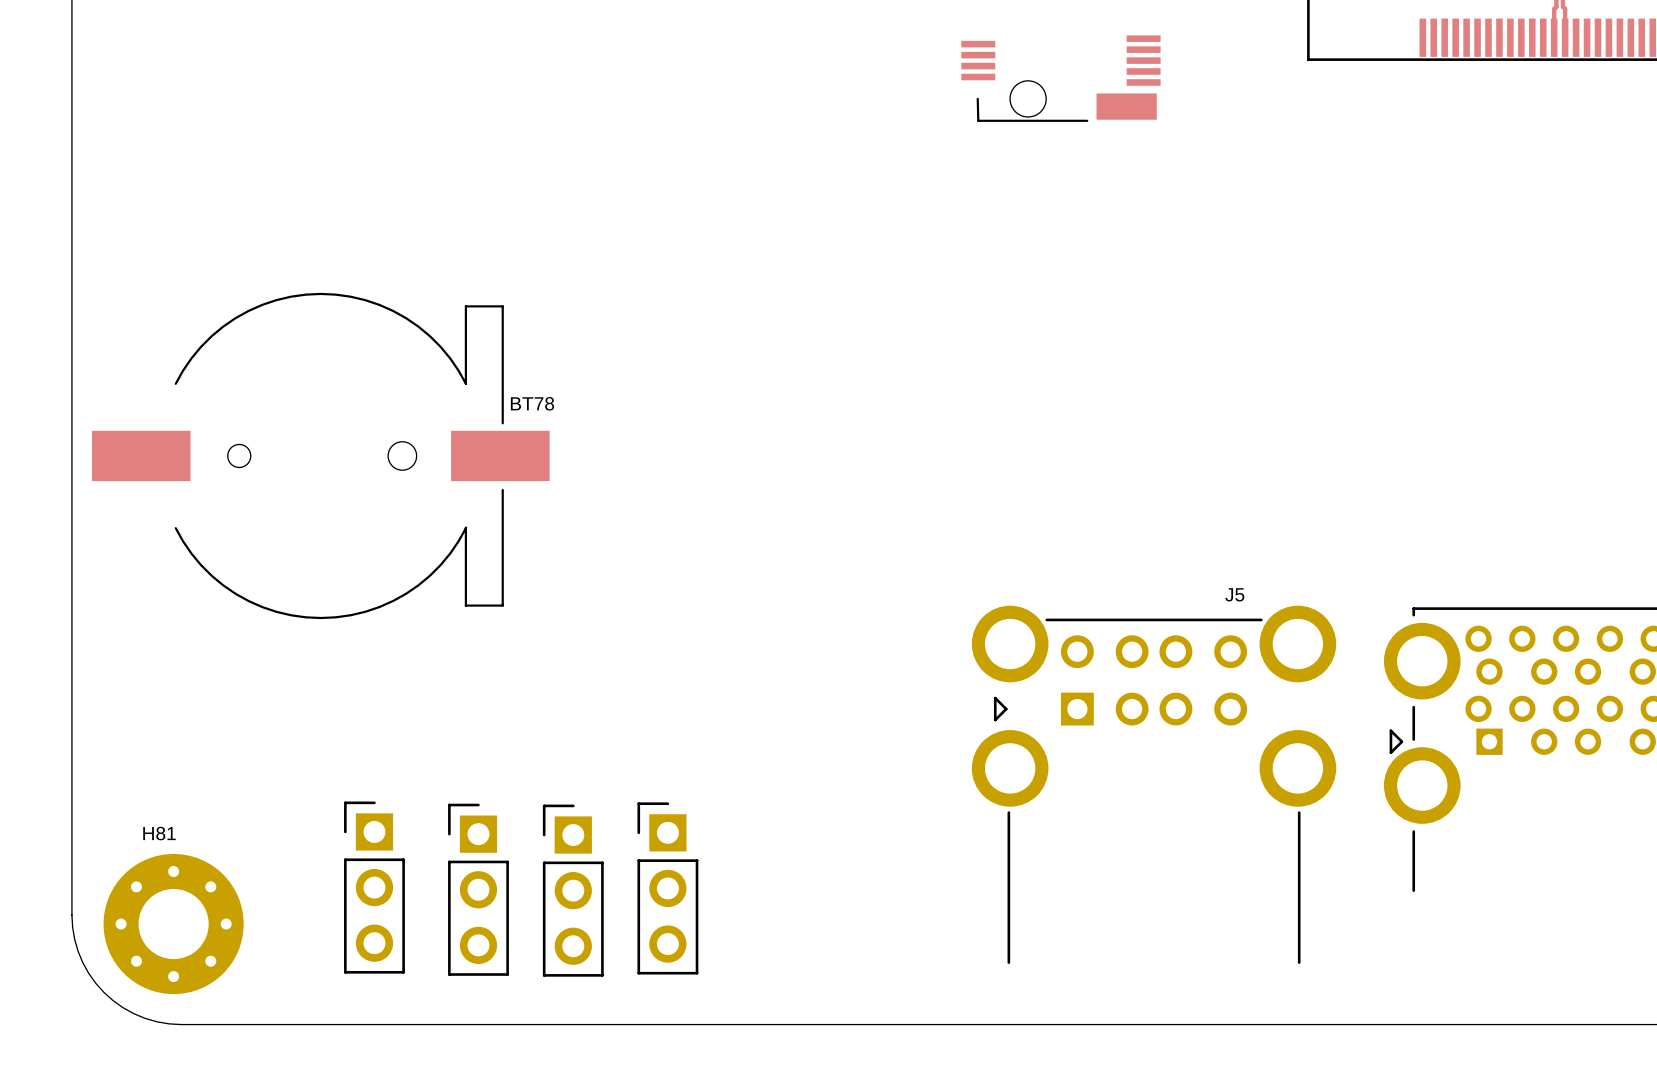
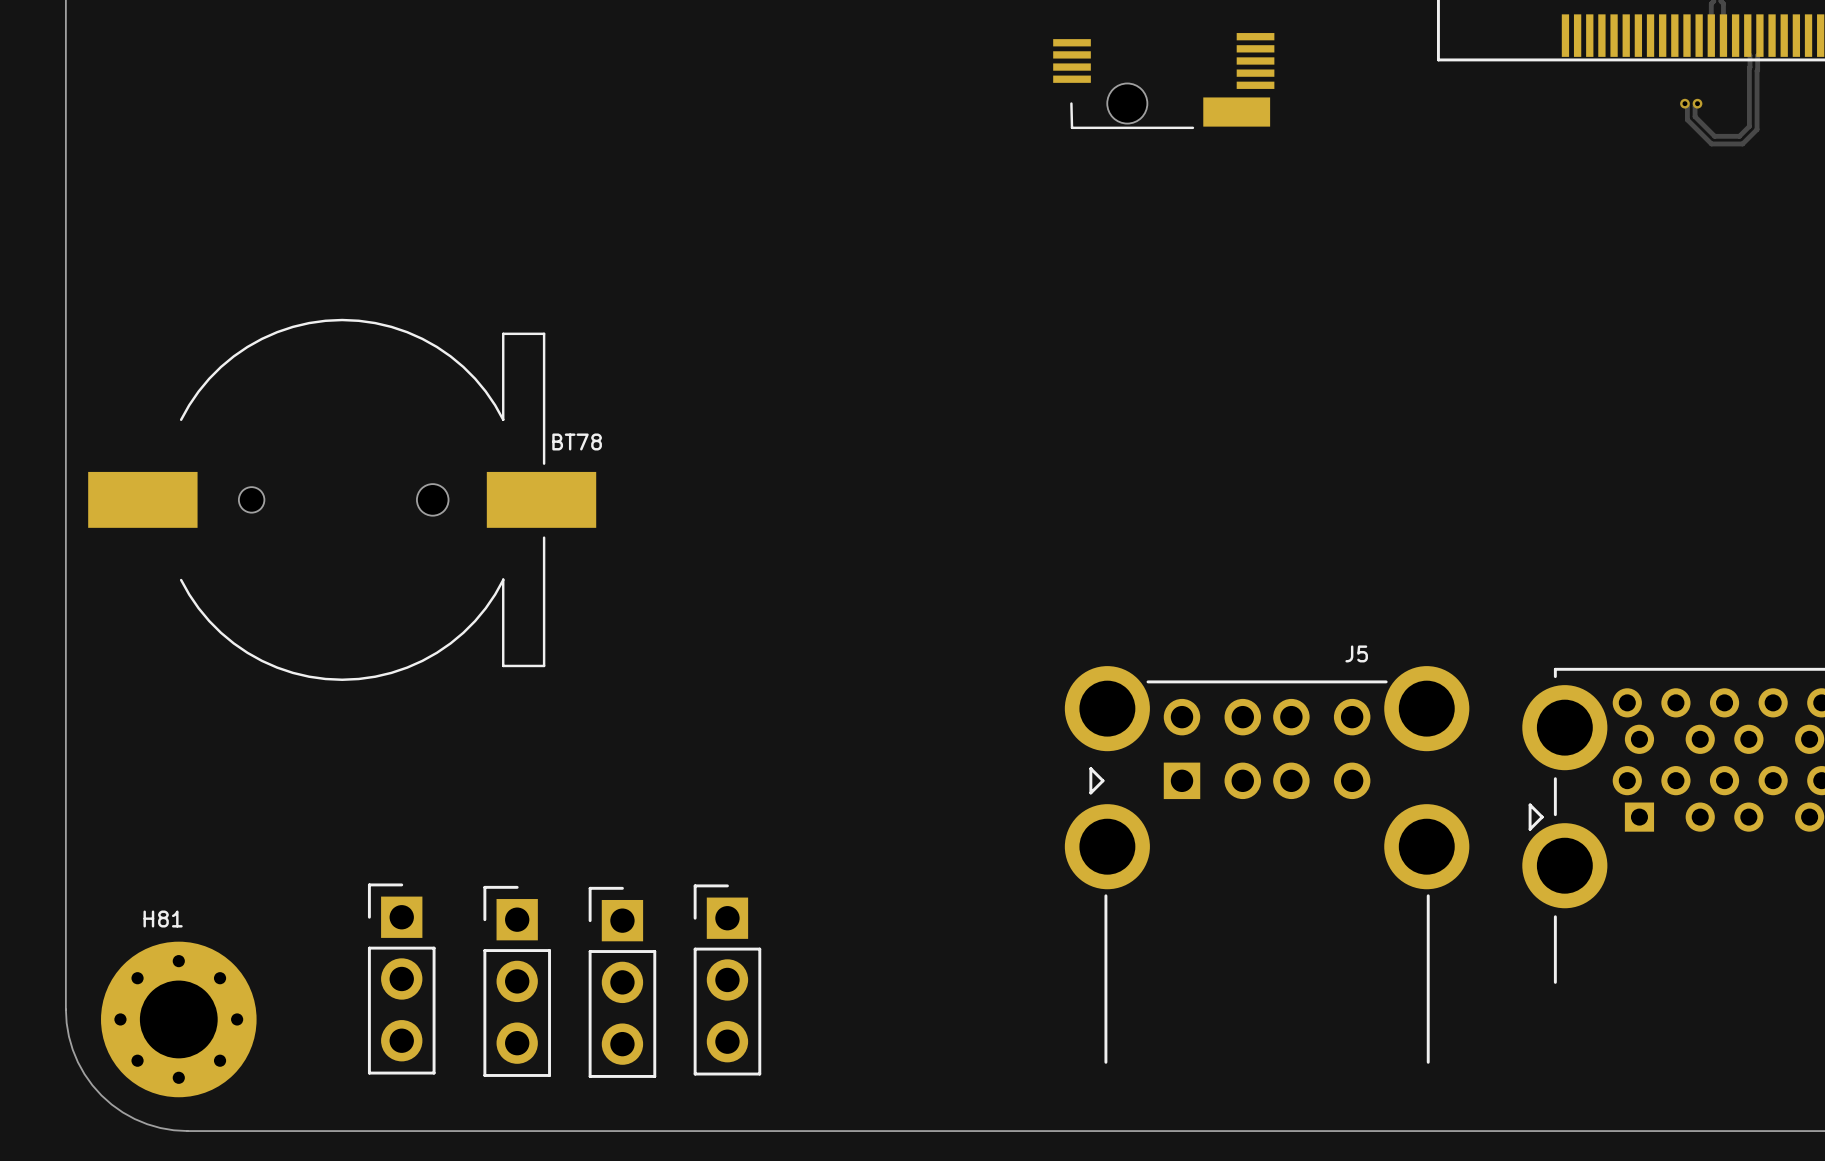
track: none -> (1747, 35) (1747, 53) (1750, 55) (1749, 126) (1739, 136) (1714, 136) (1695, 116) (1695, 106) (1697, 103)
track: none -> (1759, 35) (1757, 70) (1757, 129) (1742, 143) (1711, 143) (1687, 119) (1687, 106) (1684, 103)
via: none -> (1684, 103)
via: none -> (1697, 103)

